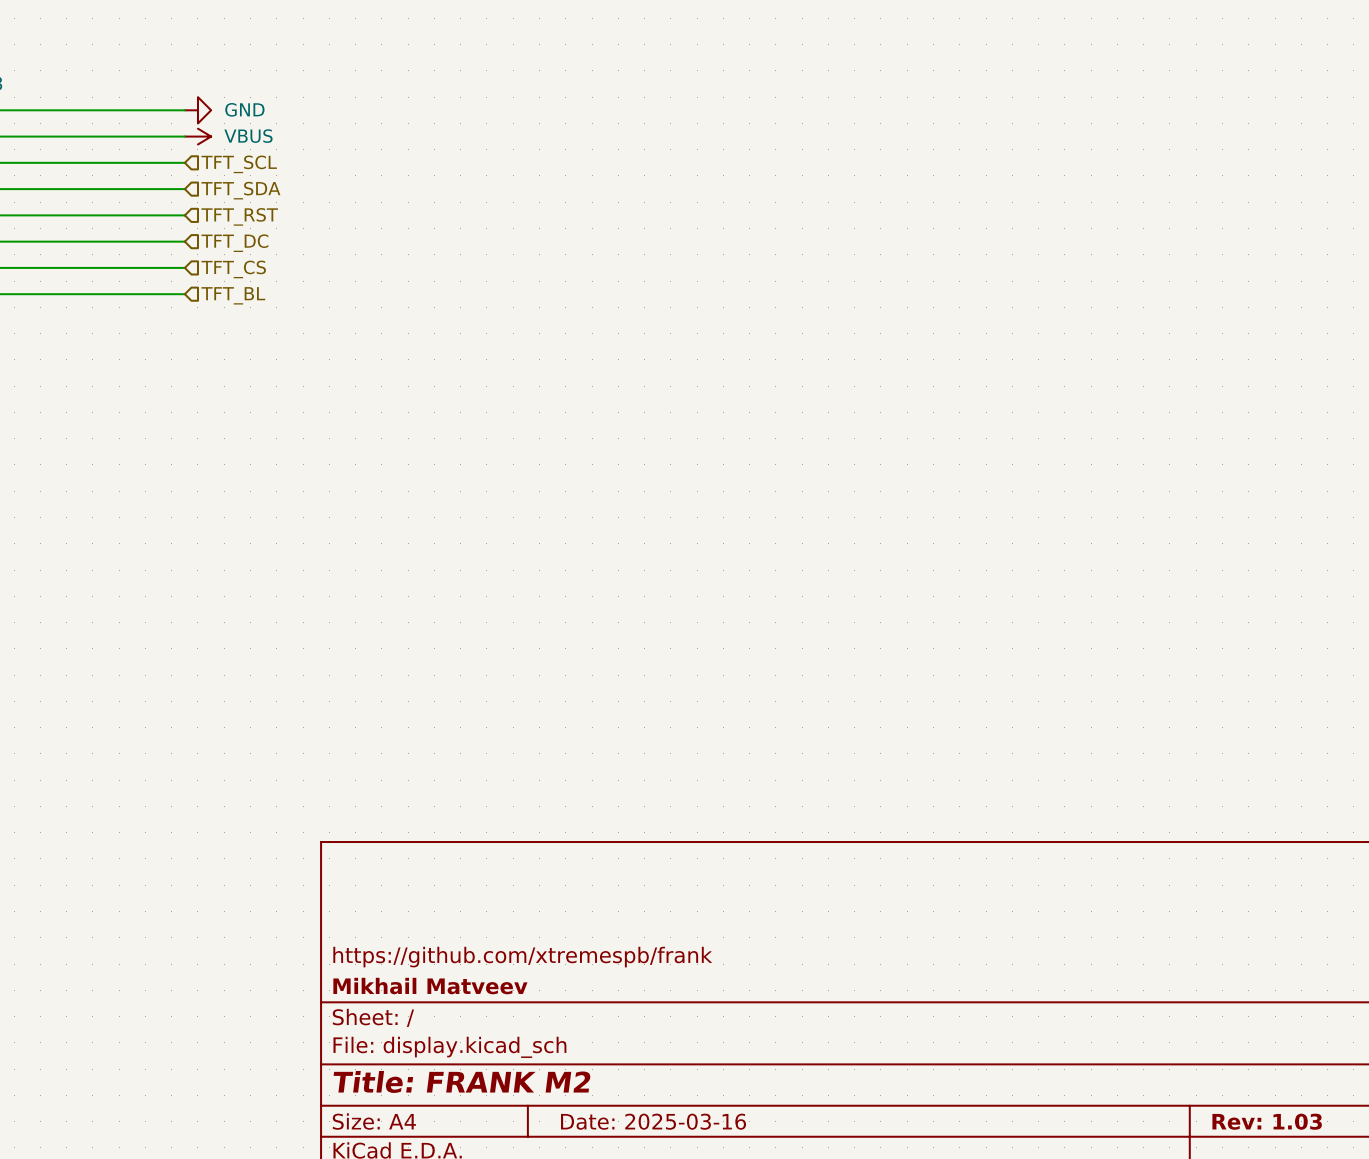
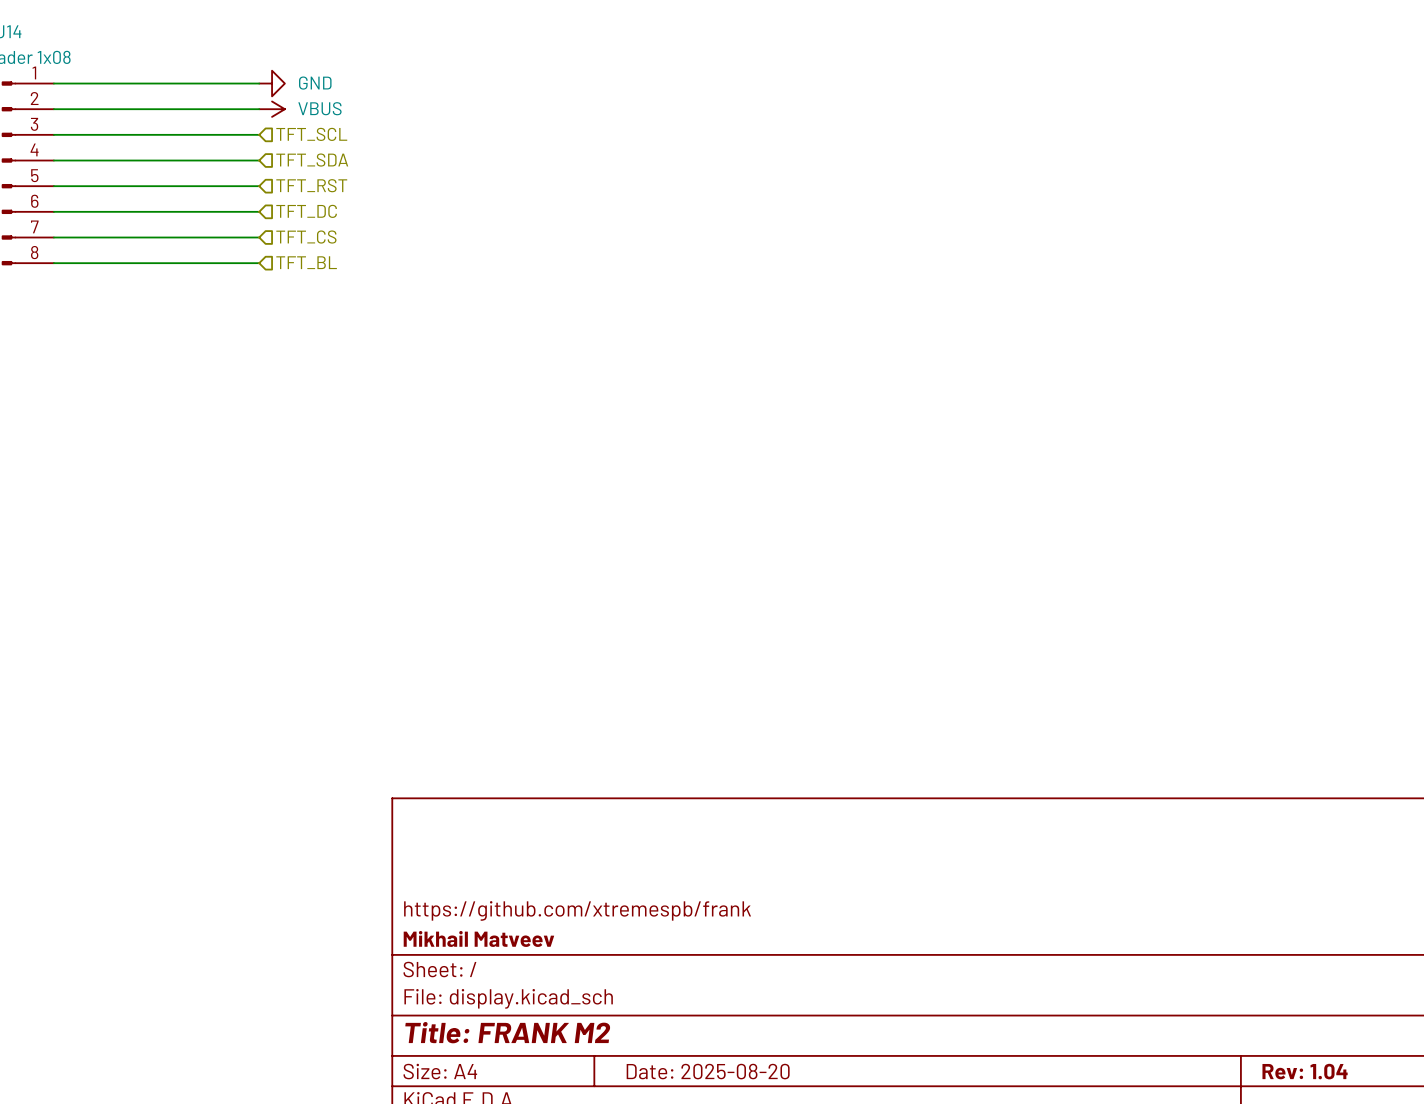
title block: Date: 2025-03-16 (653, 1121) -> Date: 2025-08-20 (708, 1071)
title block: Rev: 1.03 (1267, 1121) -> Rev: 1.04 (1305, 1071)

